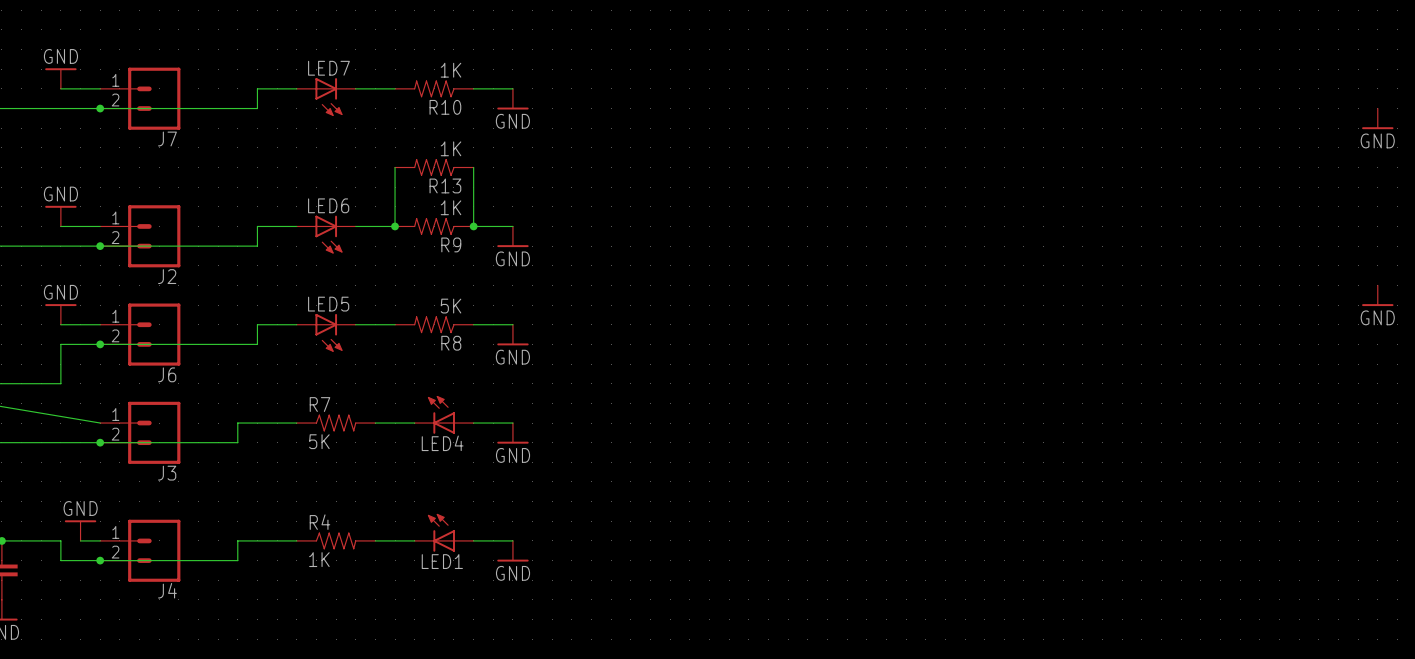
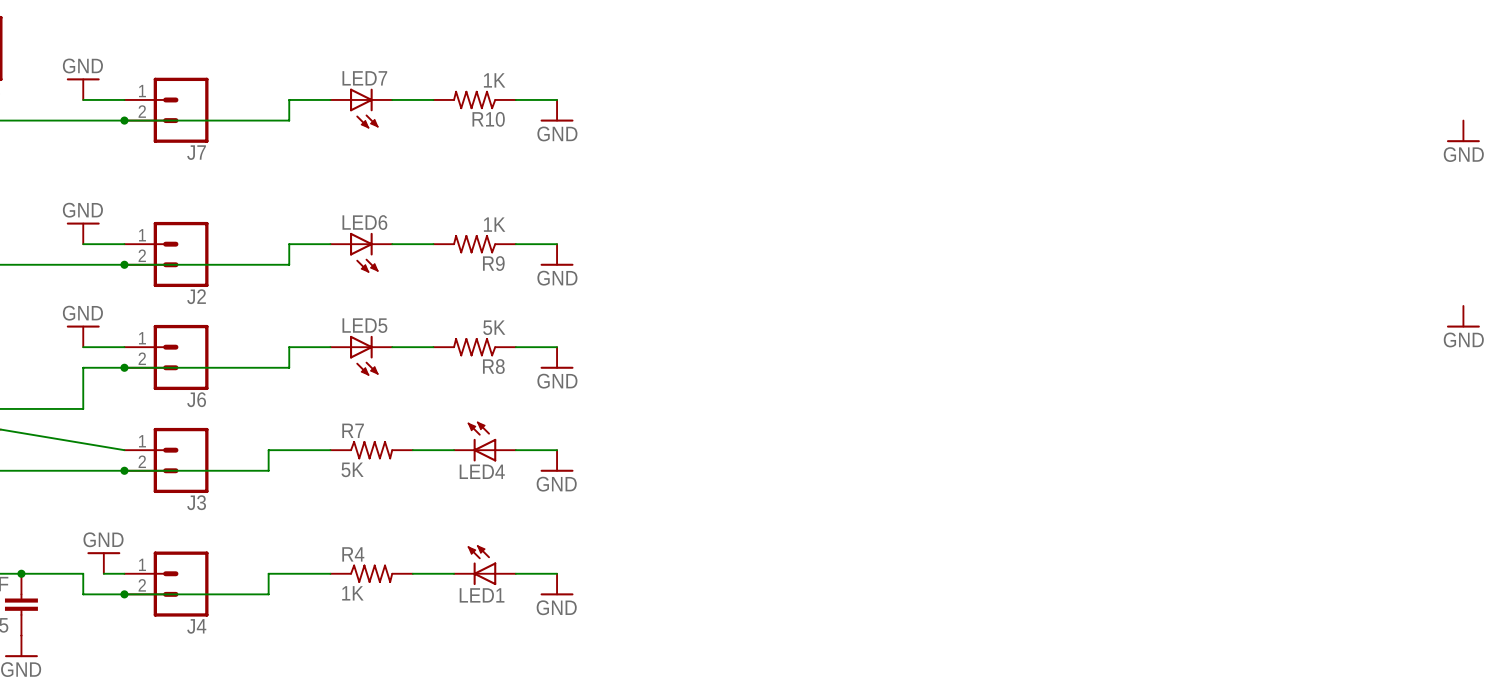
wire: (395, 167) (395, 226) -> none
R13: 1K (434, 167) -> none
wire: (473, 167) (473, 226) -> none
junction: (395, 226) -> none
junction: (473, 226) -> none

